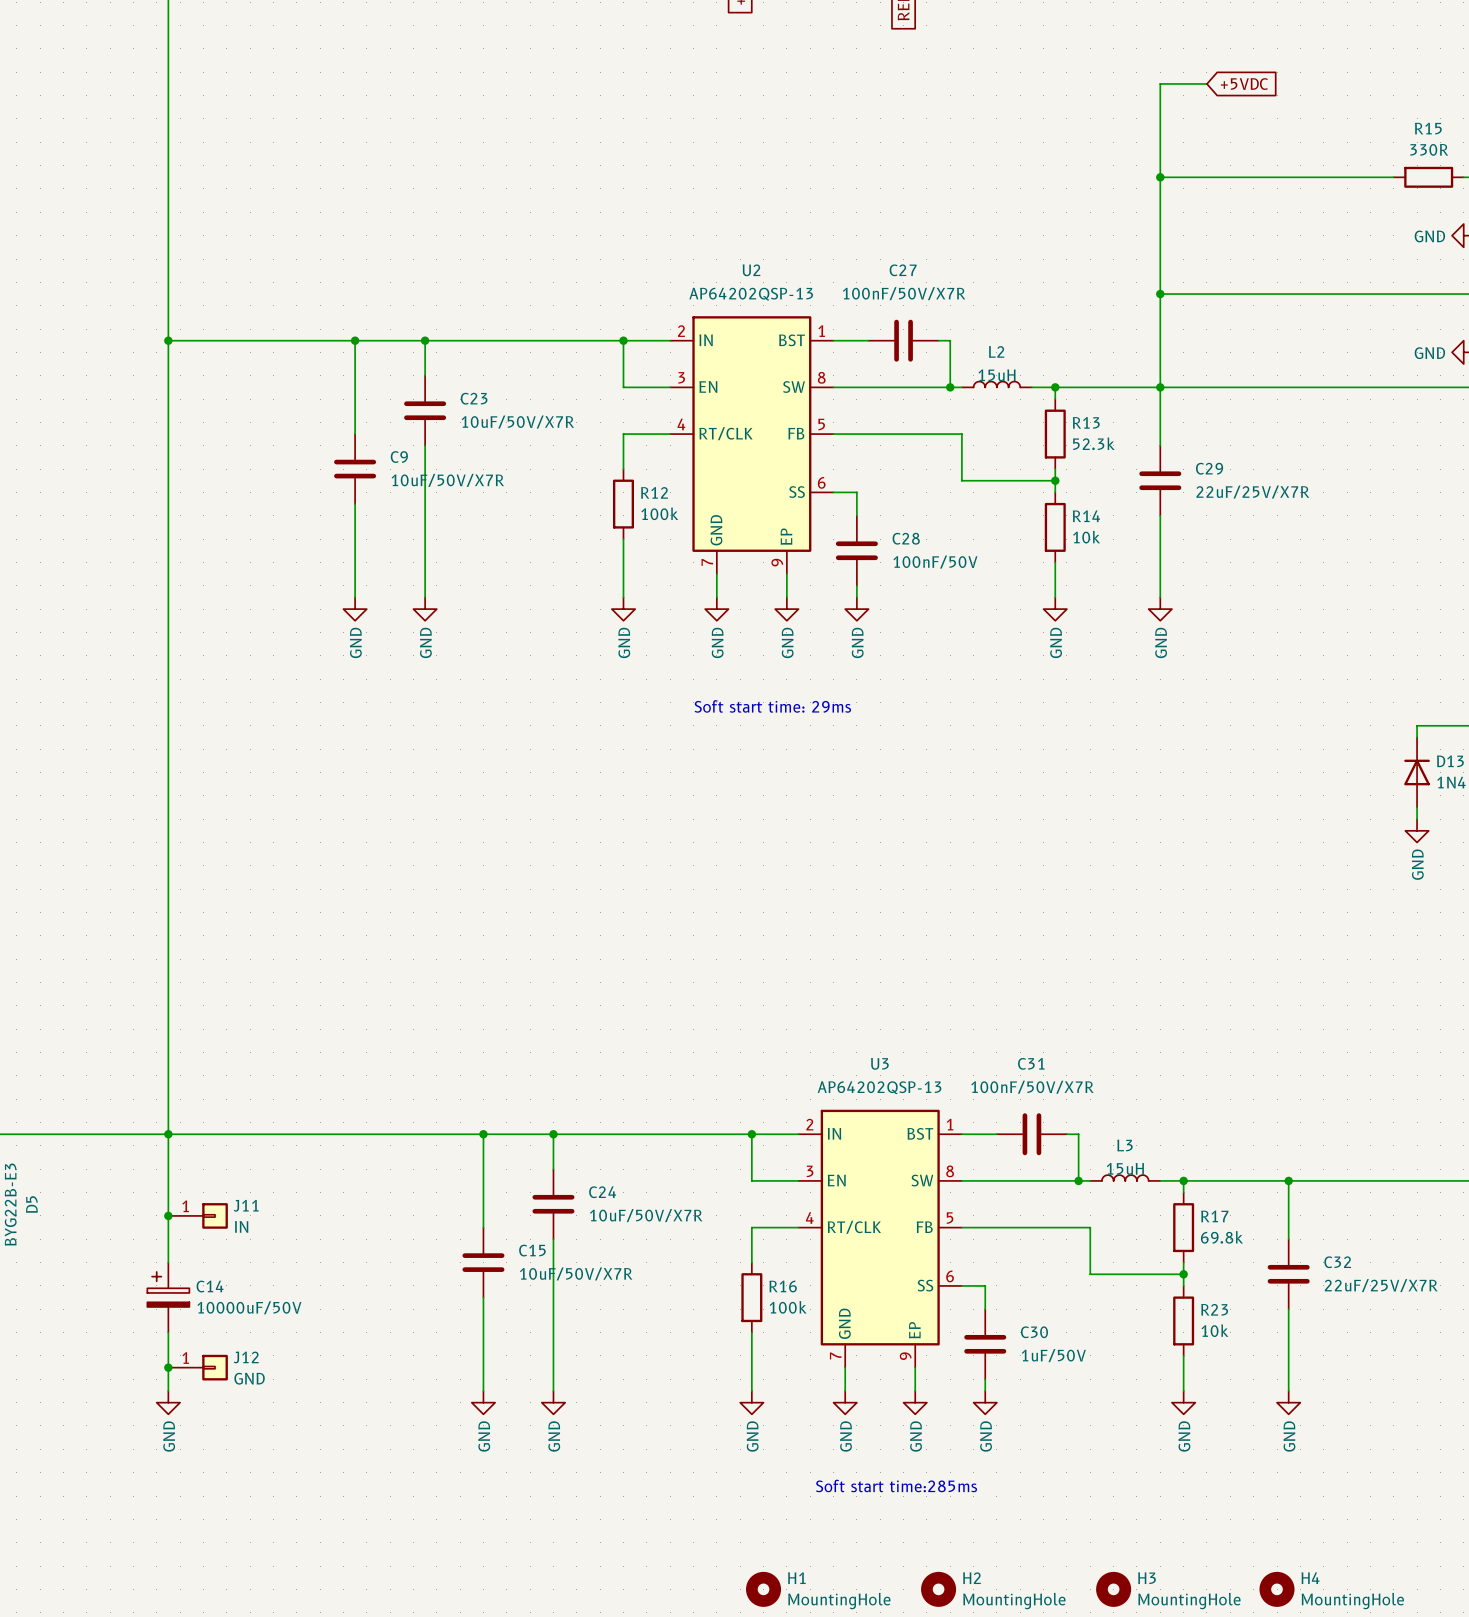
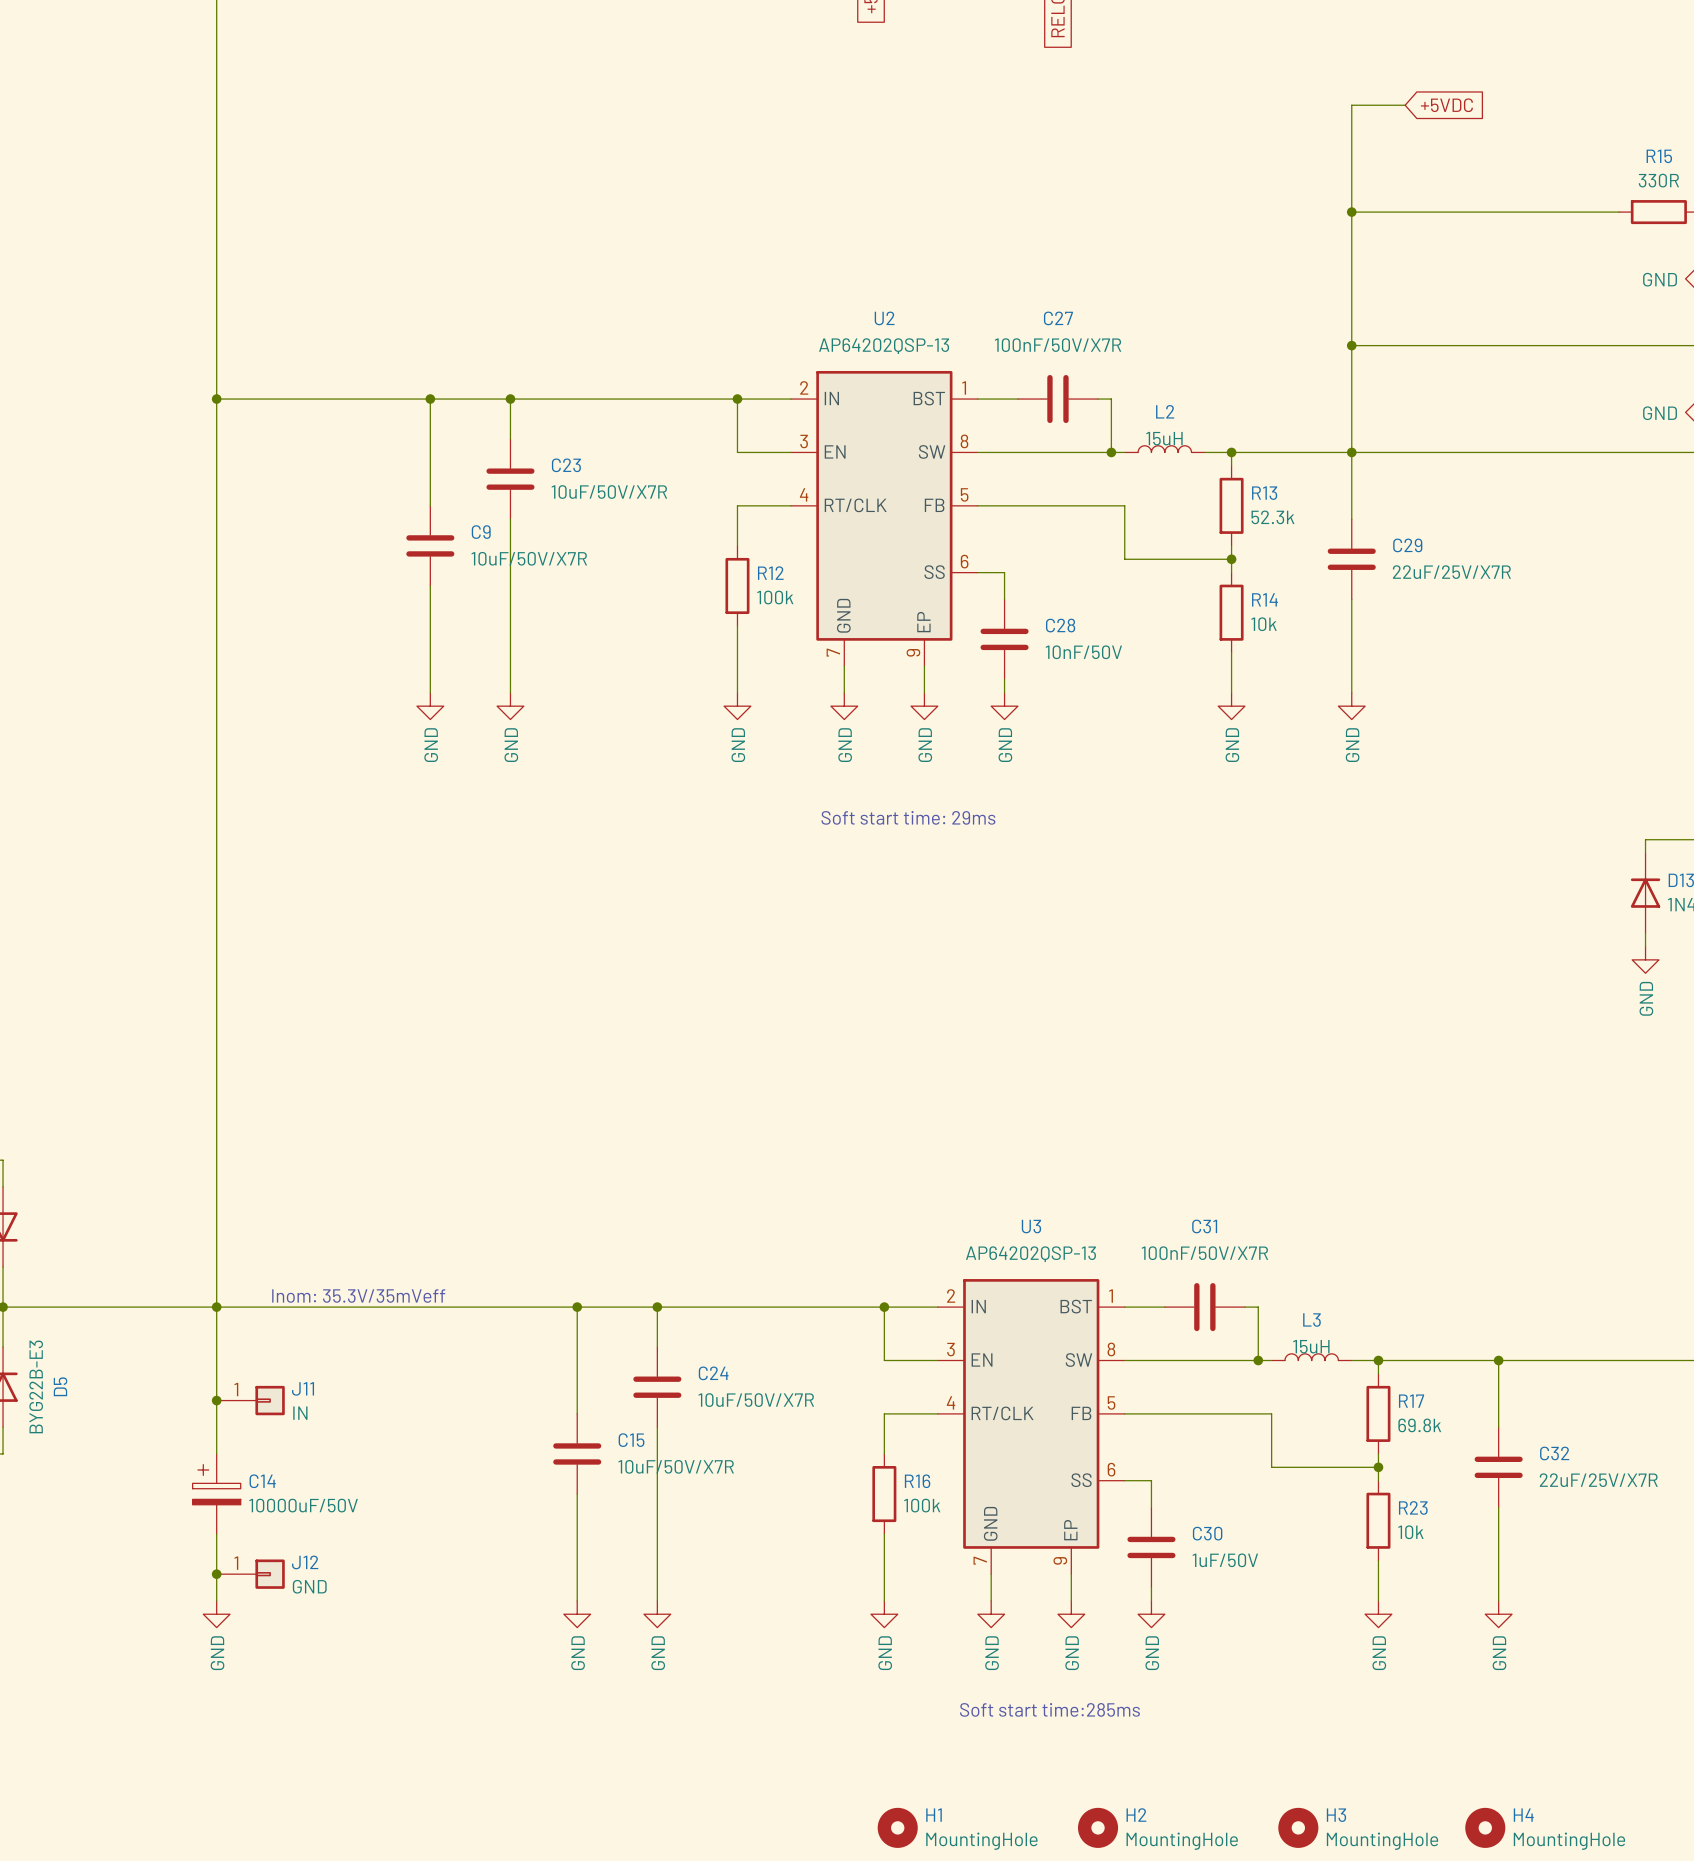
C28 value: 100nF/50V (935, 562) -> 10nF/50V (1083, 652)
text: none -> Inom: 35.3V/35mVeff (358, 1296)

